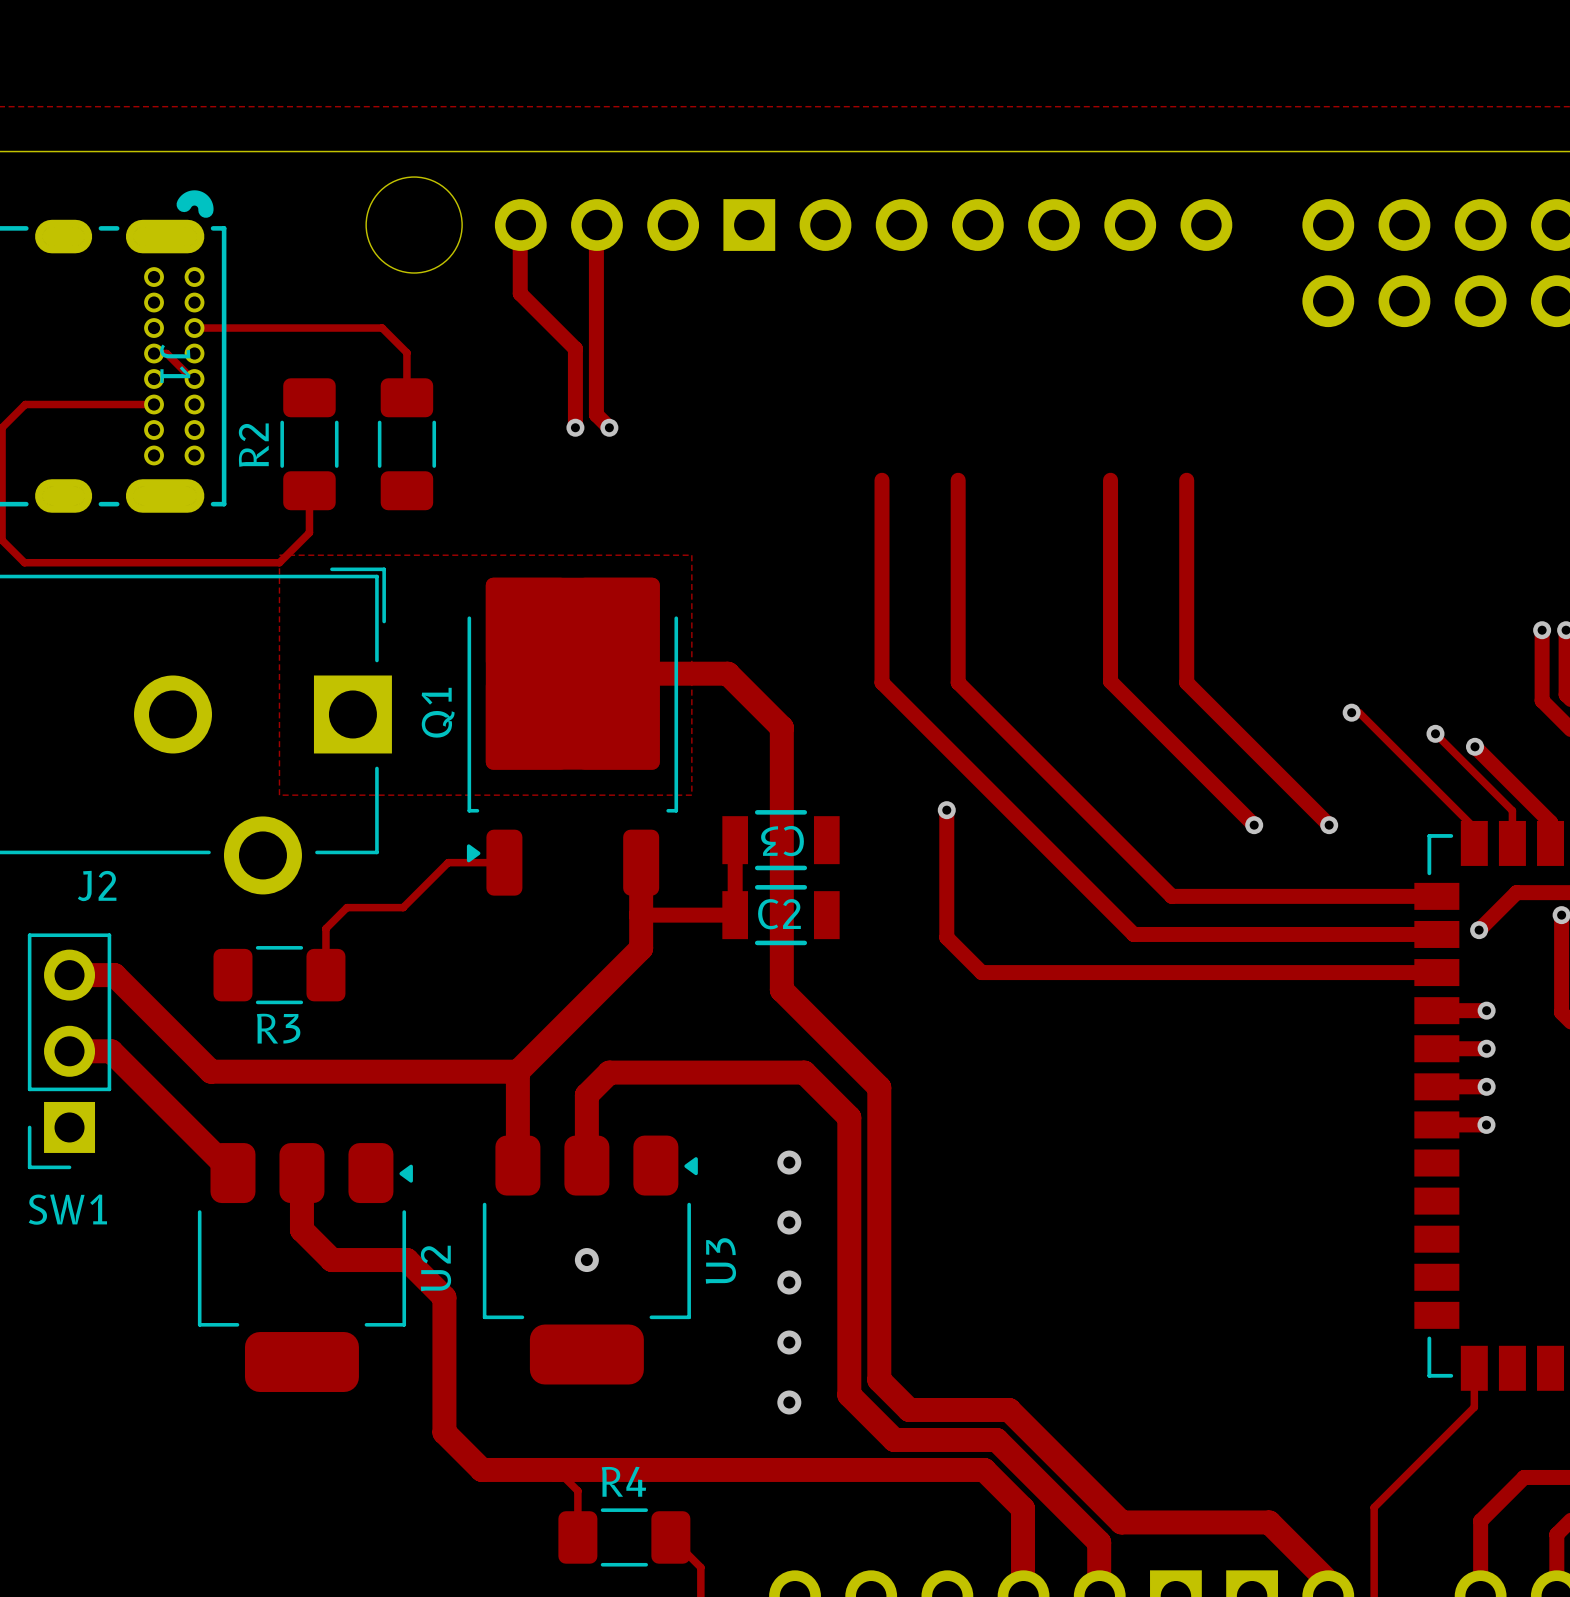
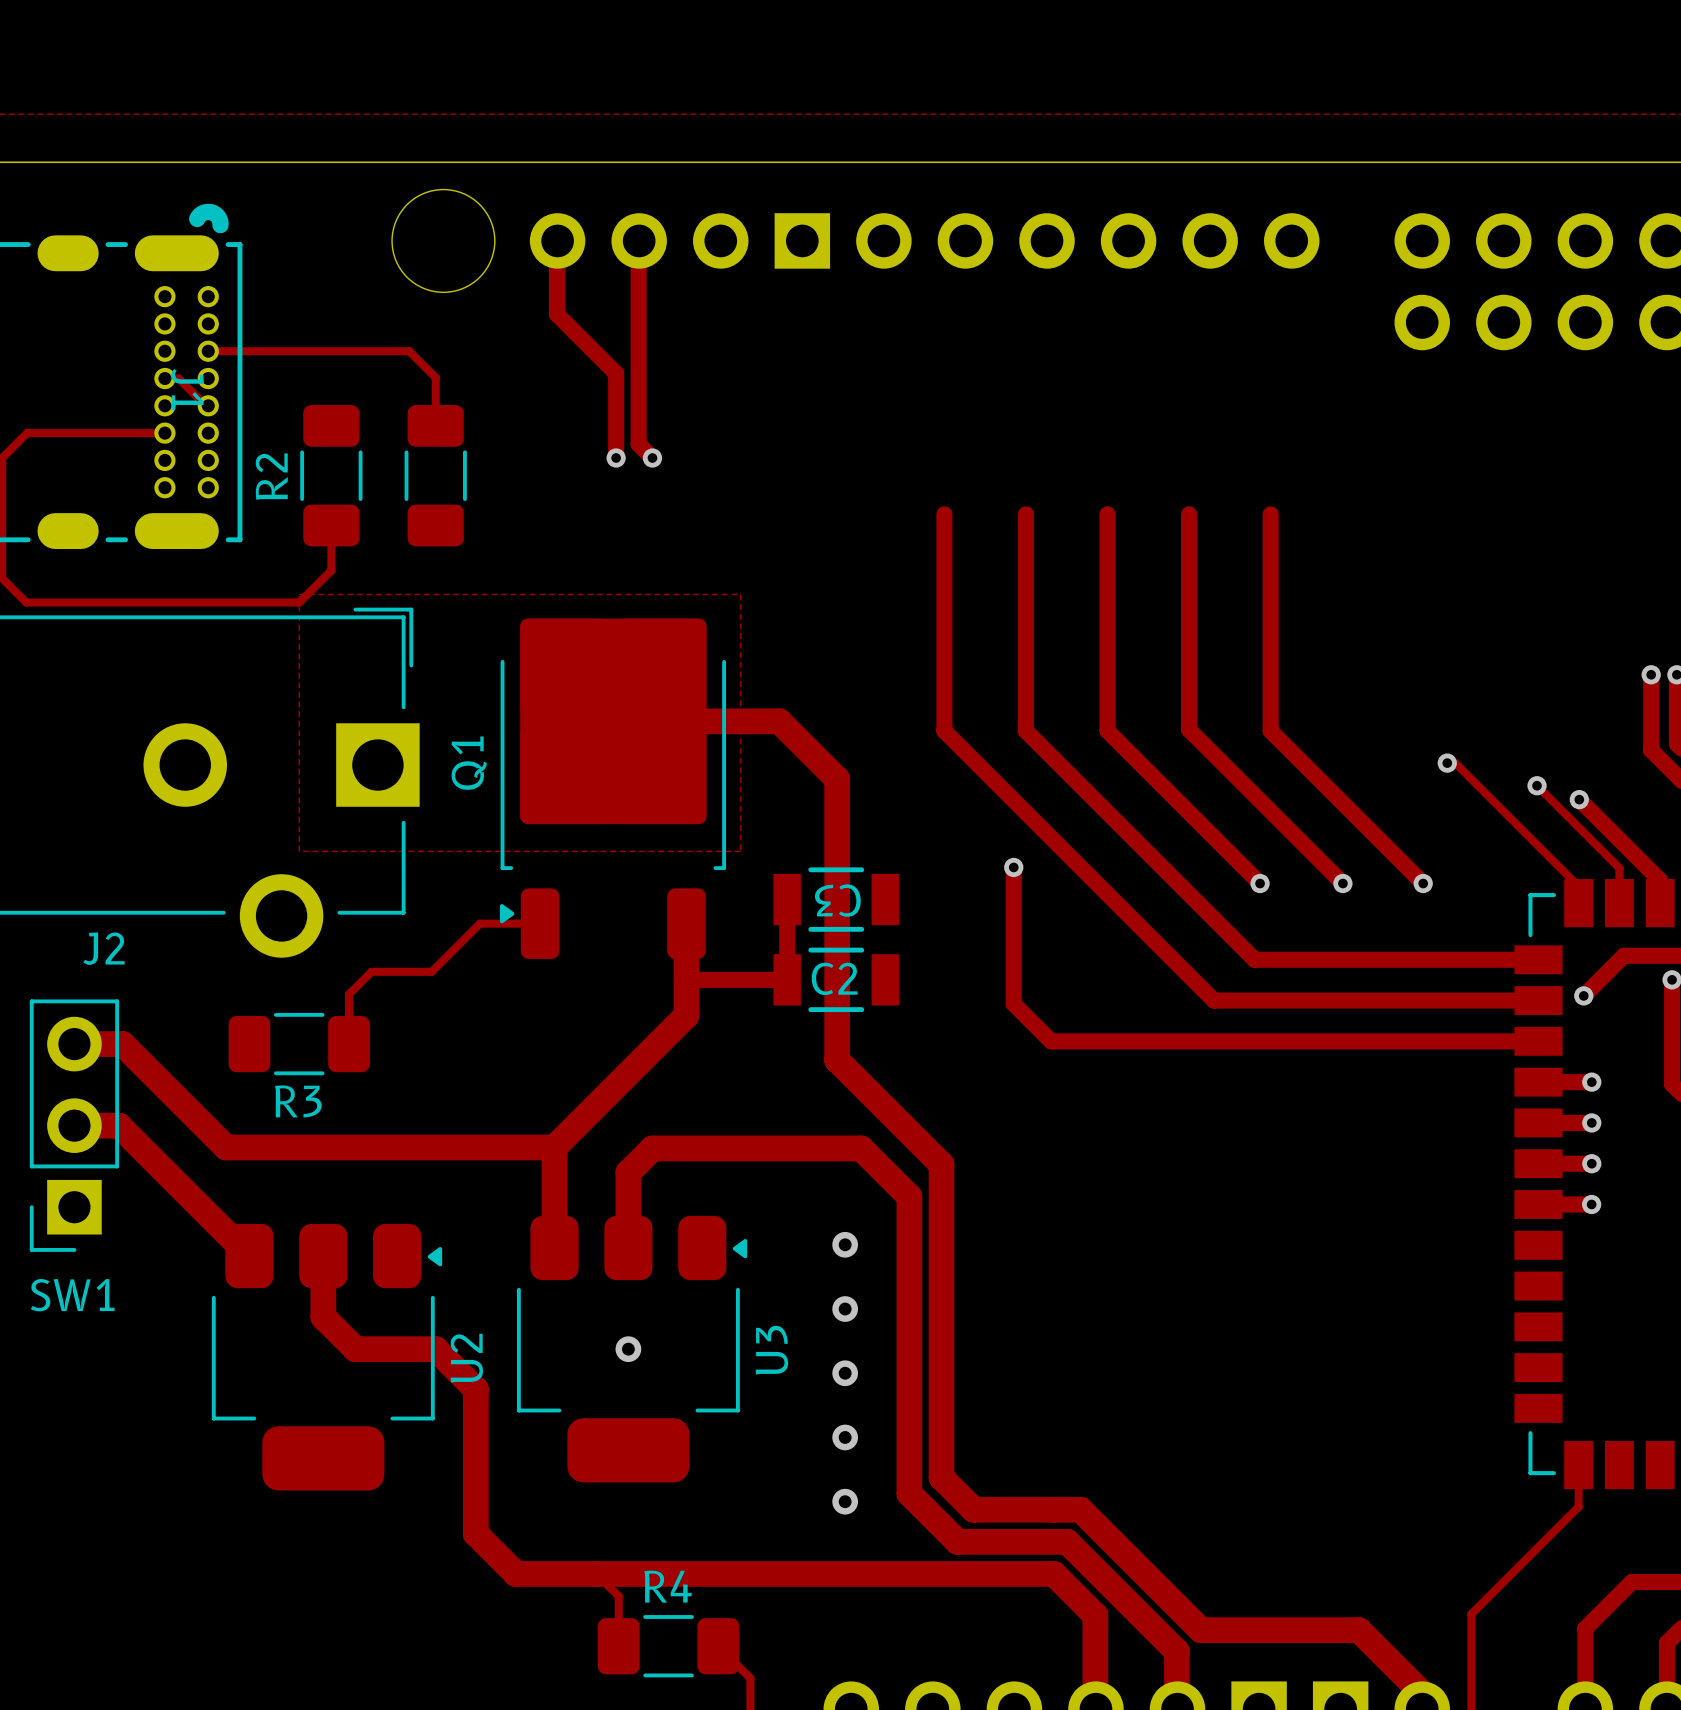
track: none -> (1107, 514) (1107, 730) (1260, 883)
via: none -> (1260, 883)

